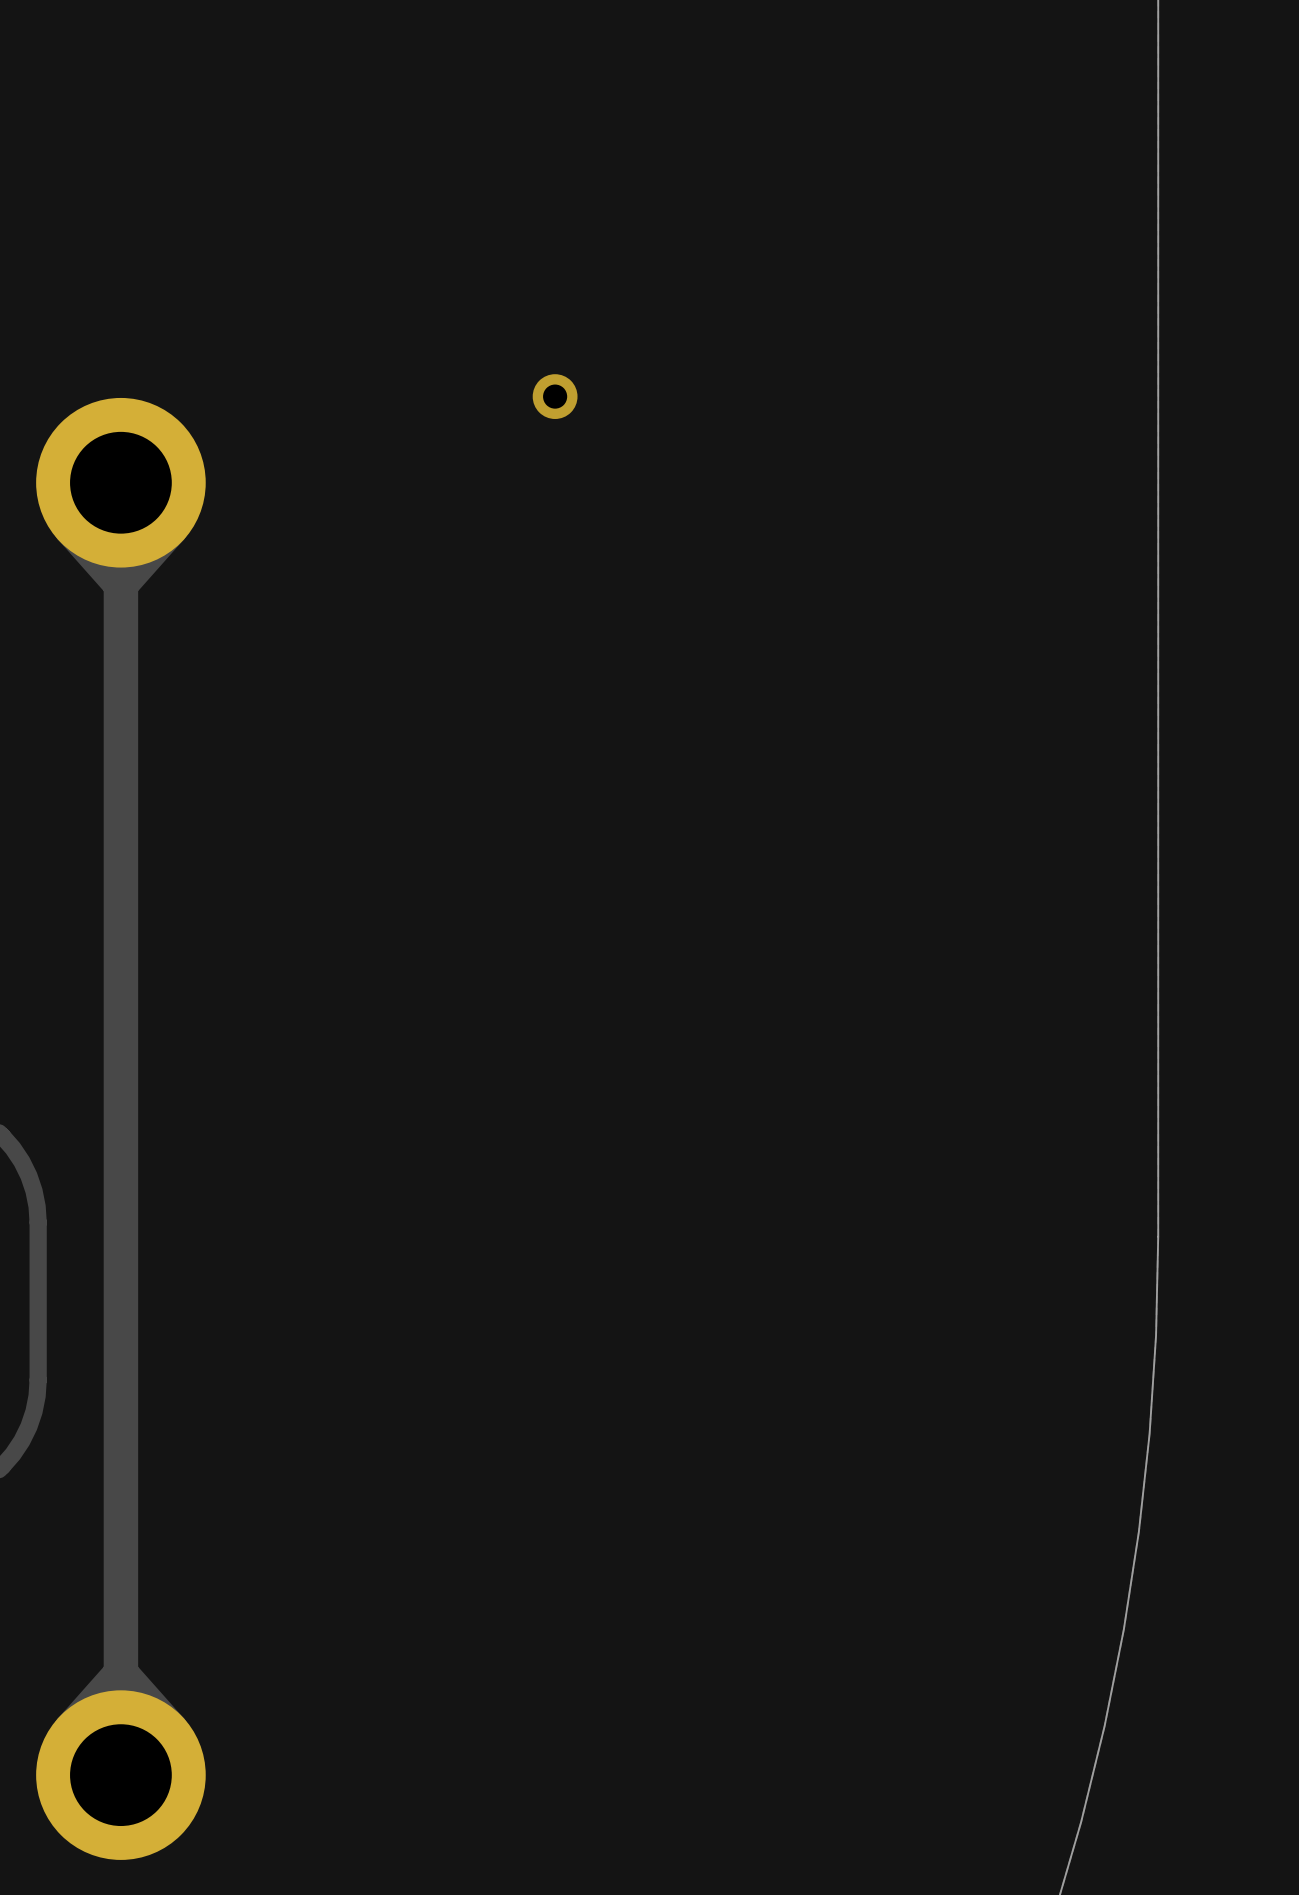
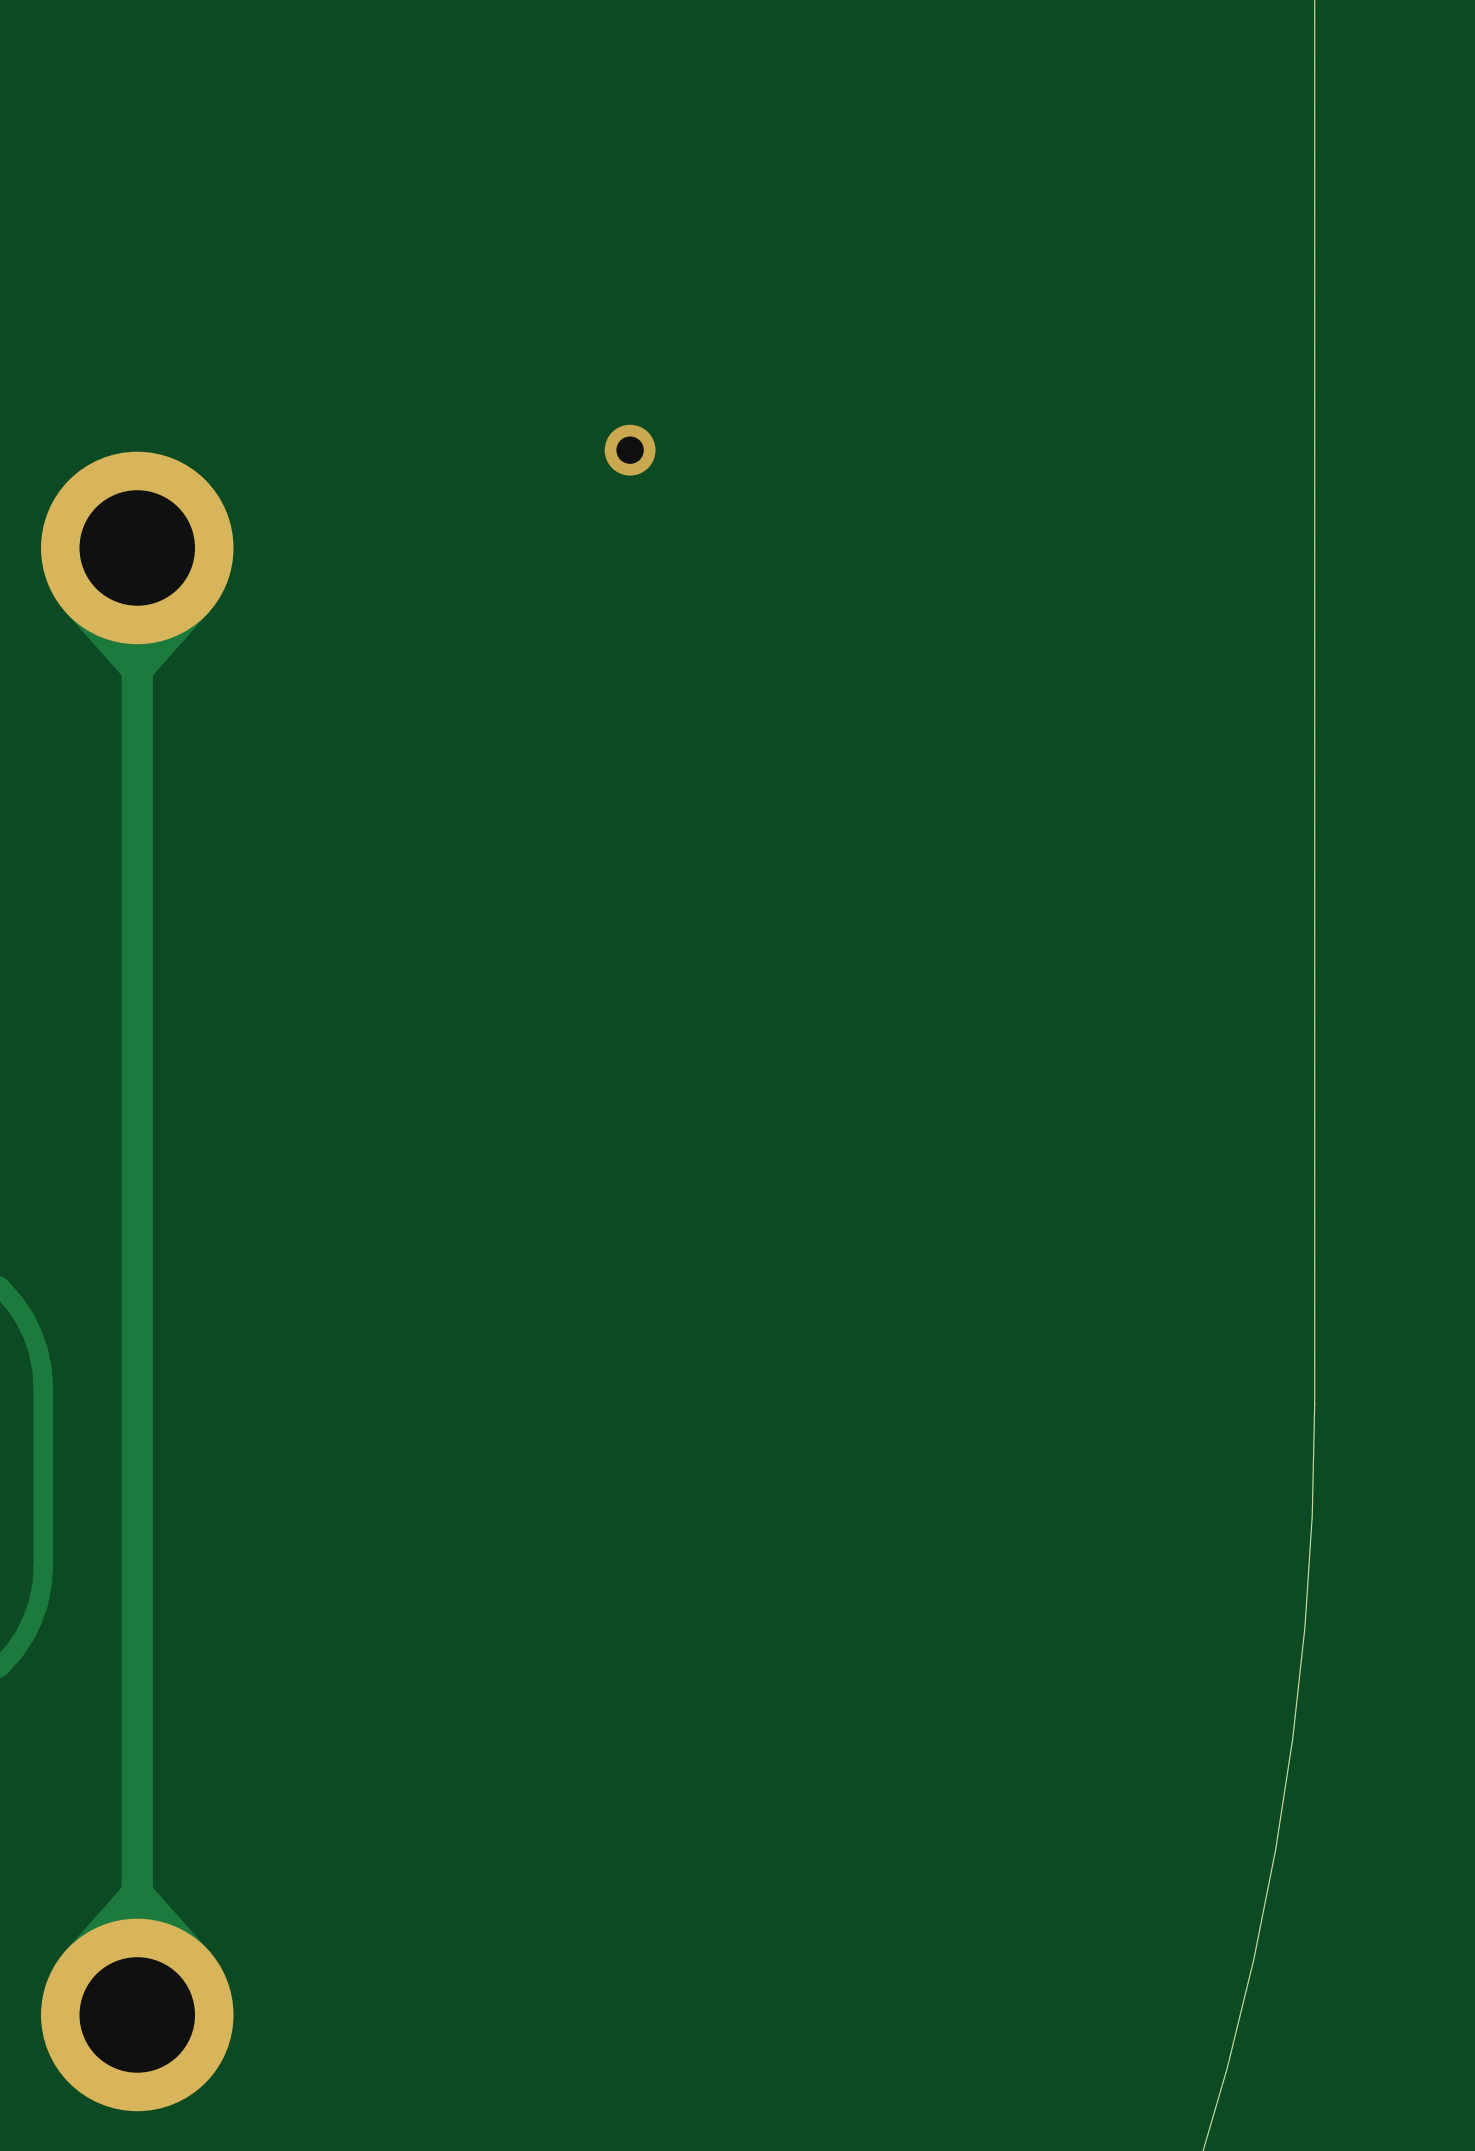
track width: thick (120, 482) (120, 1775) -> thin (137, 547) (137, 2014)

